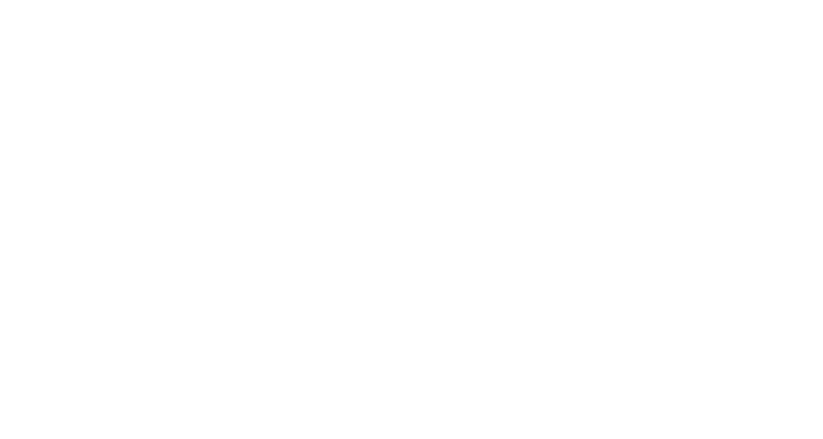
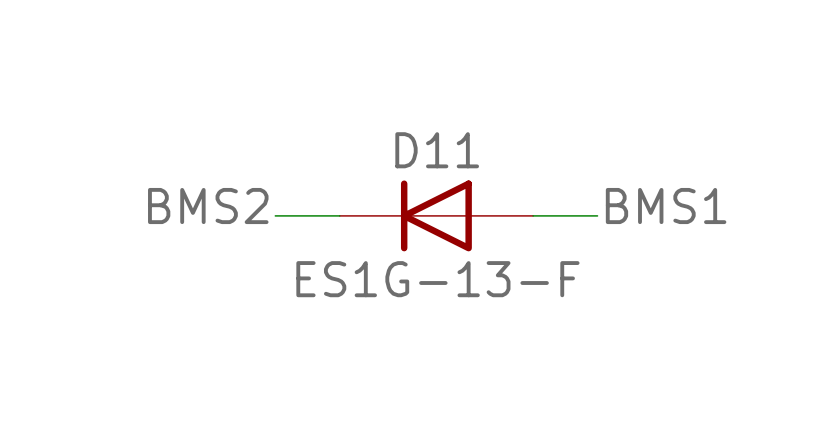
label: none -> BMS2 (208, 206)
label: none -> BMS1 (666, 206)
wire: none -> (275, 215) (339, 215)
D11: none -> ES1G-13-F (436, 215)
wire: none -> (533, 215) (597, 215)

